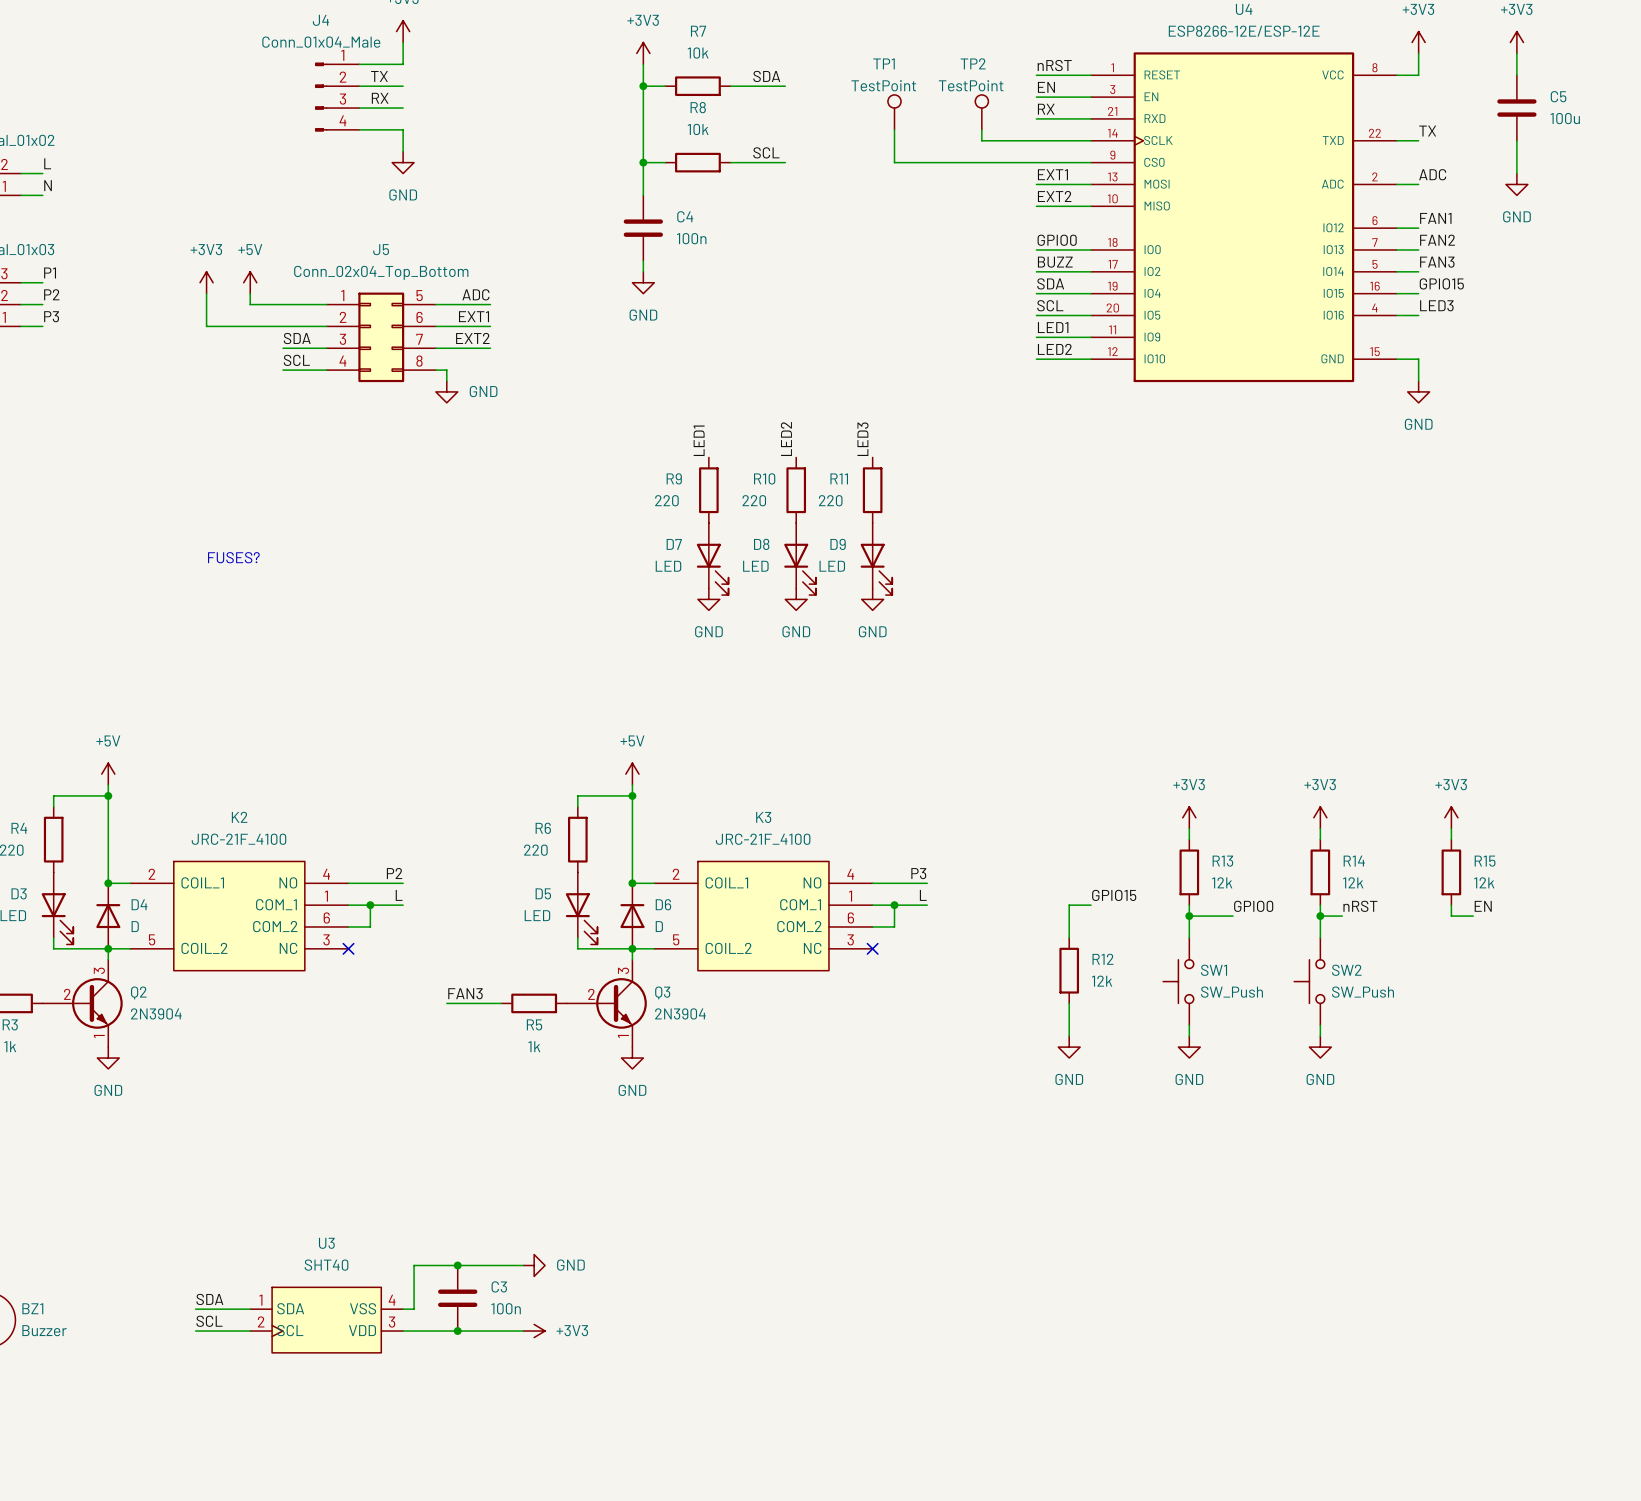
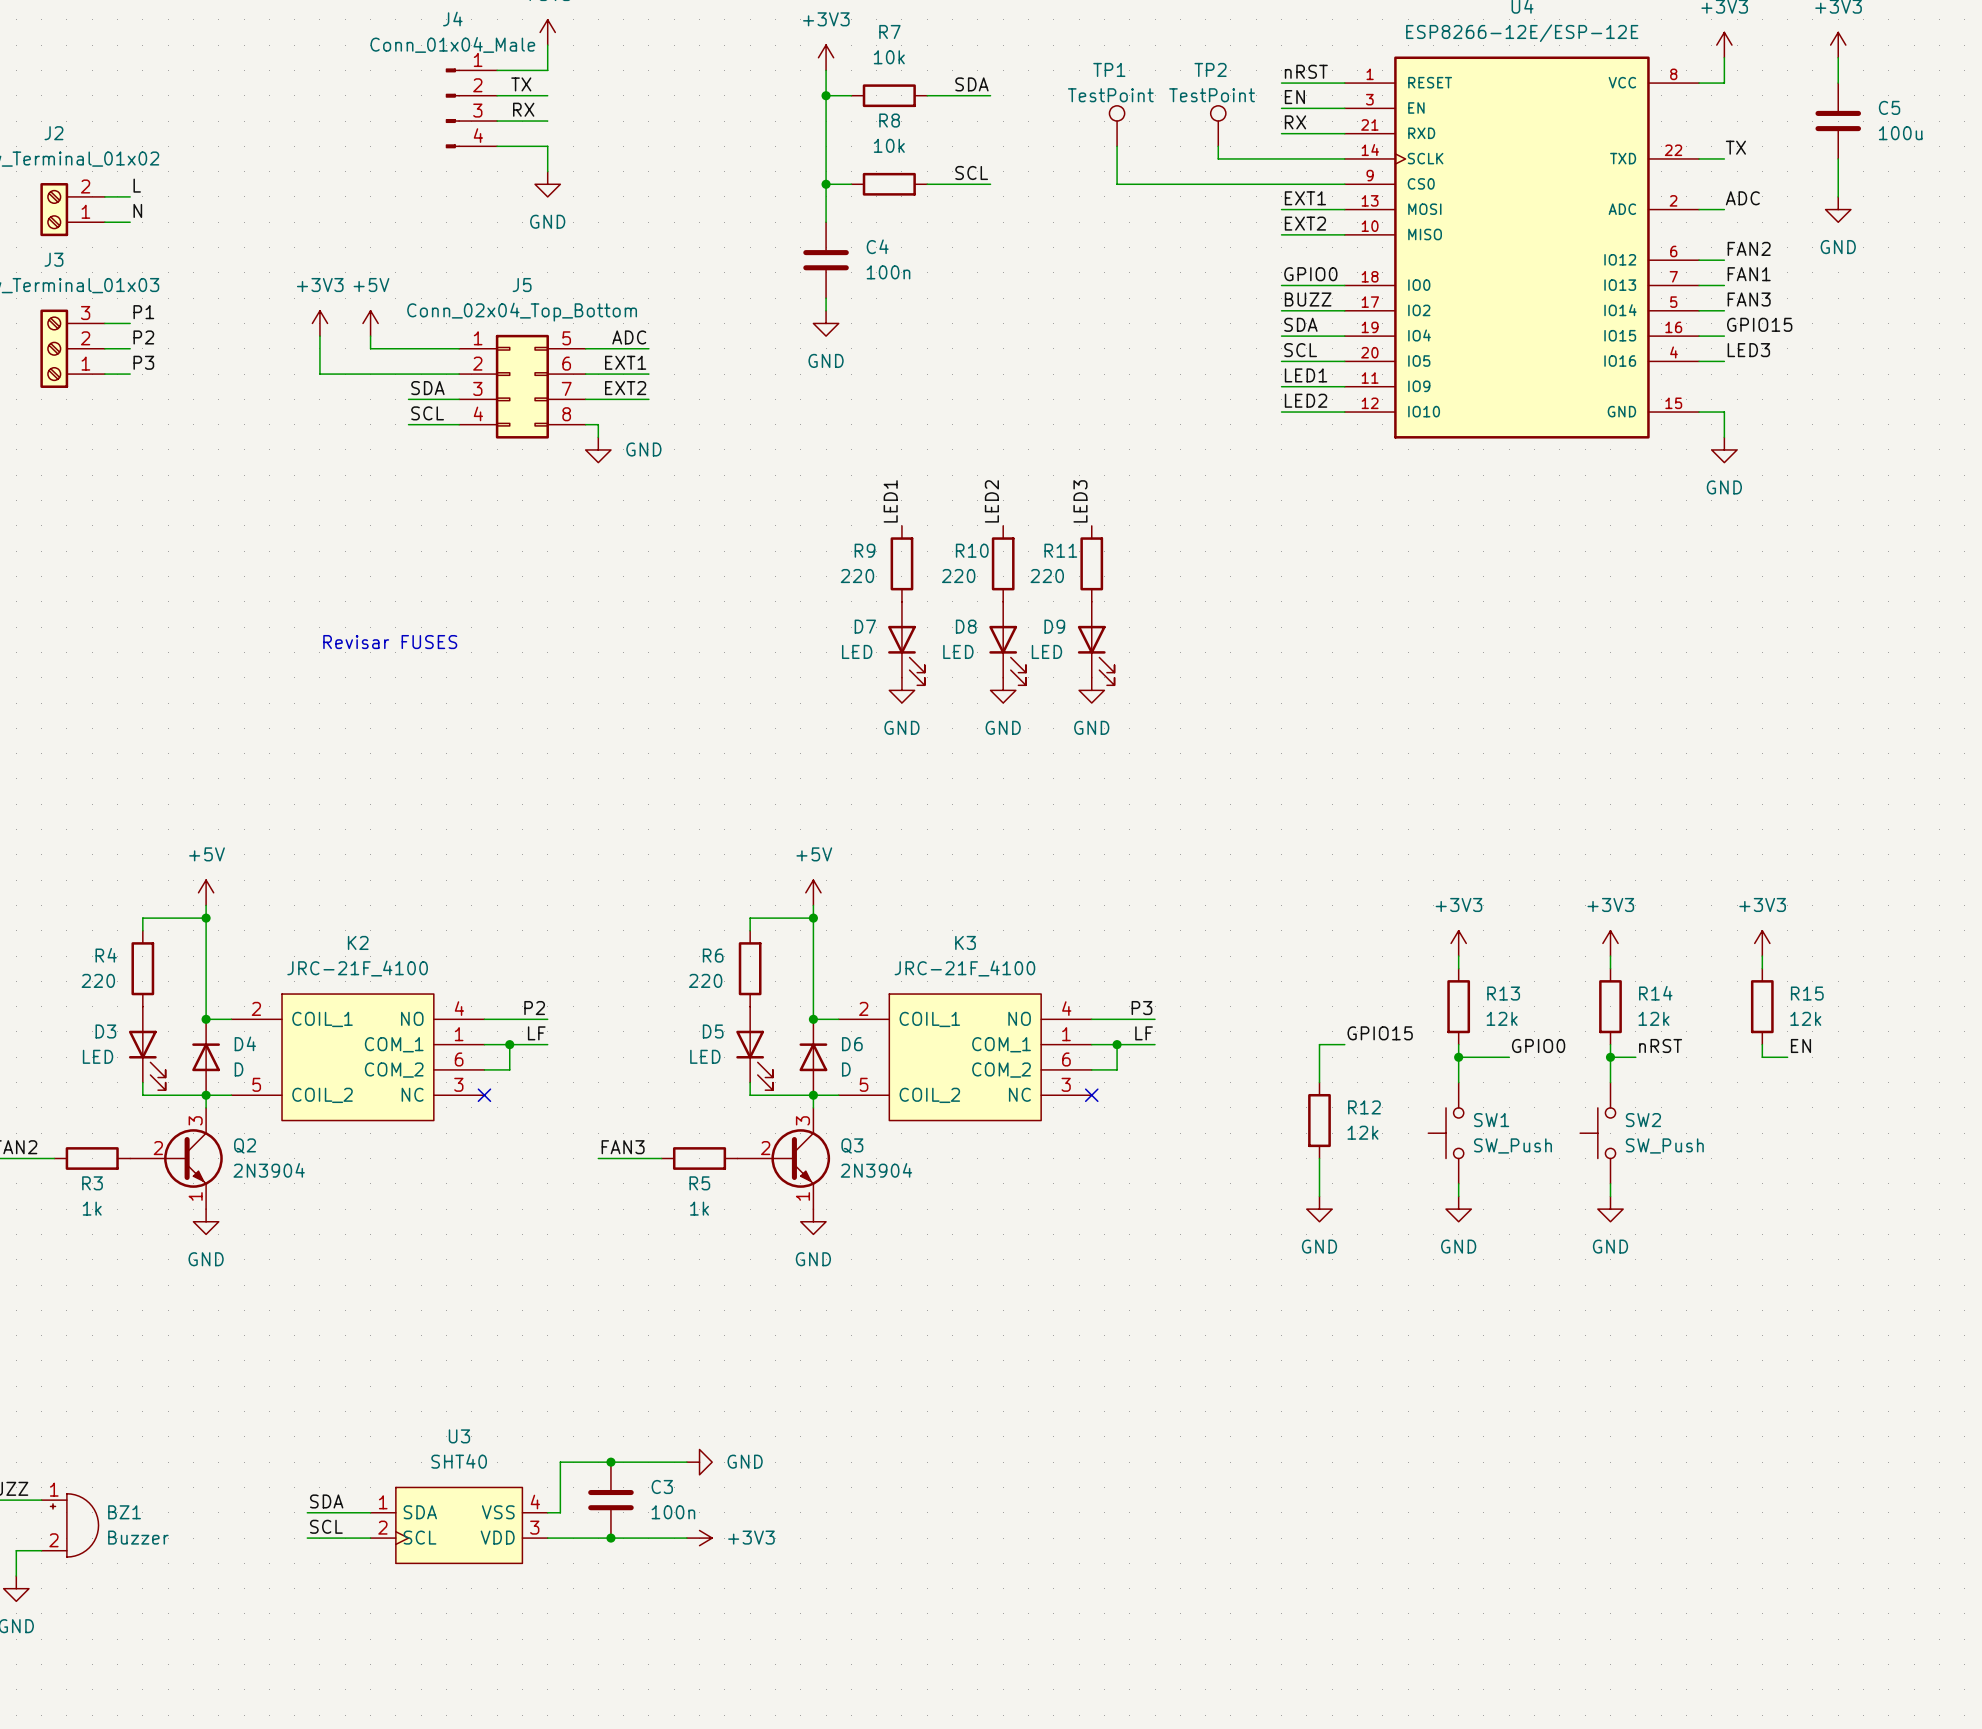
label: FAN1 (1435, 218) -> FAN2 (1749, 248)
label: FAN2 (1437, 240) -> FAN1 (1749, 274)
text: FUSES? (233, 557) -> Revisar FUSES (390, 642)
label: L (399, 895) -> LF (536, 1033)
label: L (923, 895) -> LF (1144, 1033)

